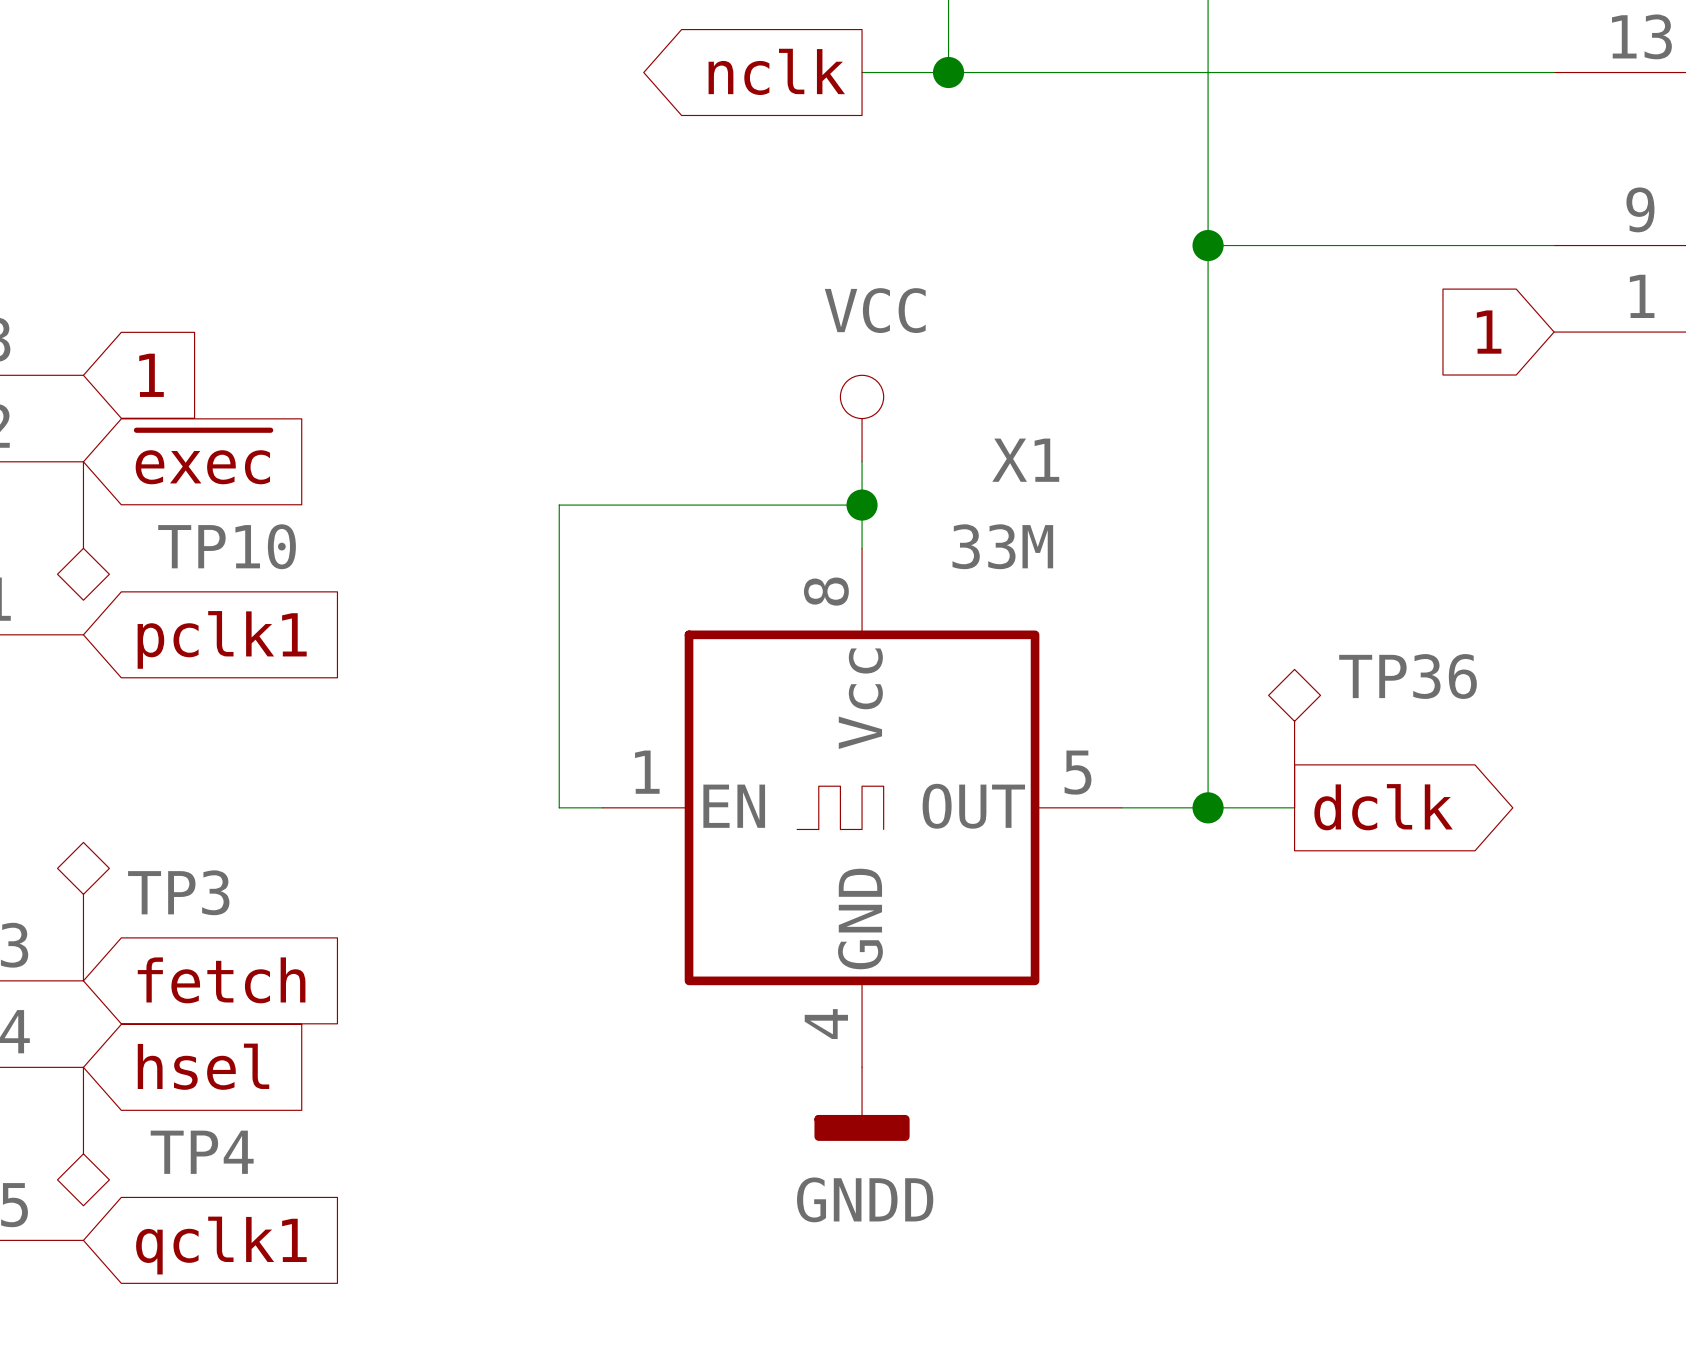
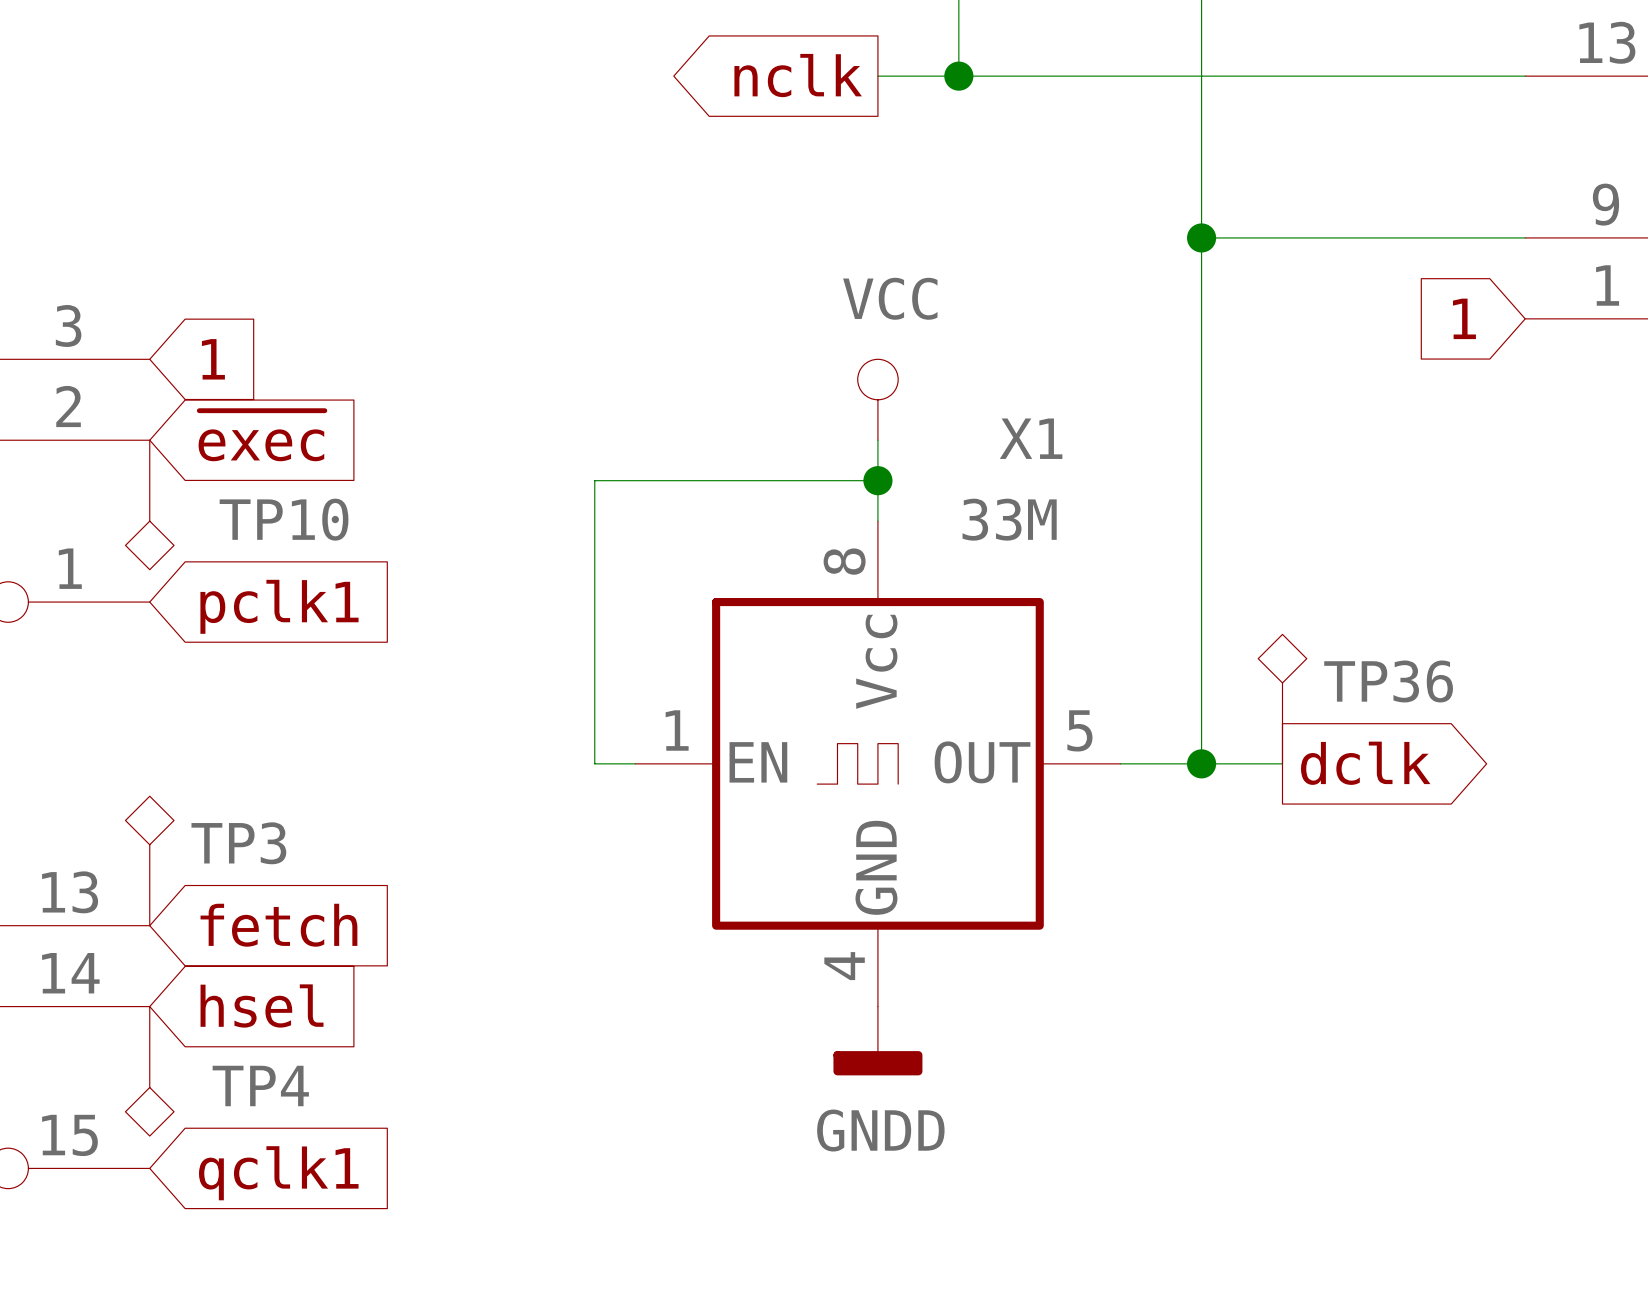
TP36 name position: TP36 (1408, 676) -> TP36 (1388, 681)

